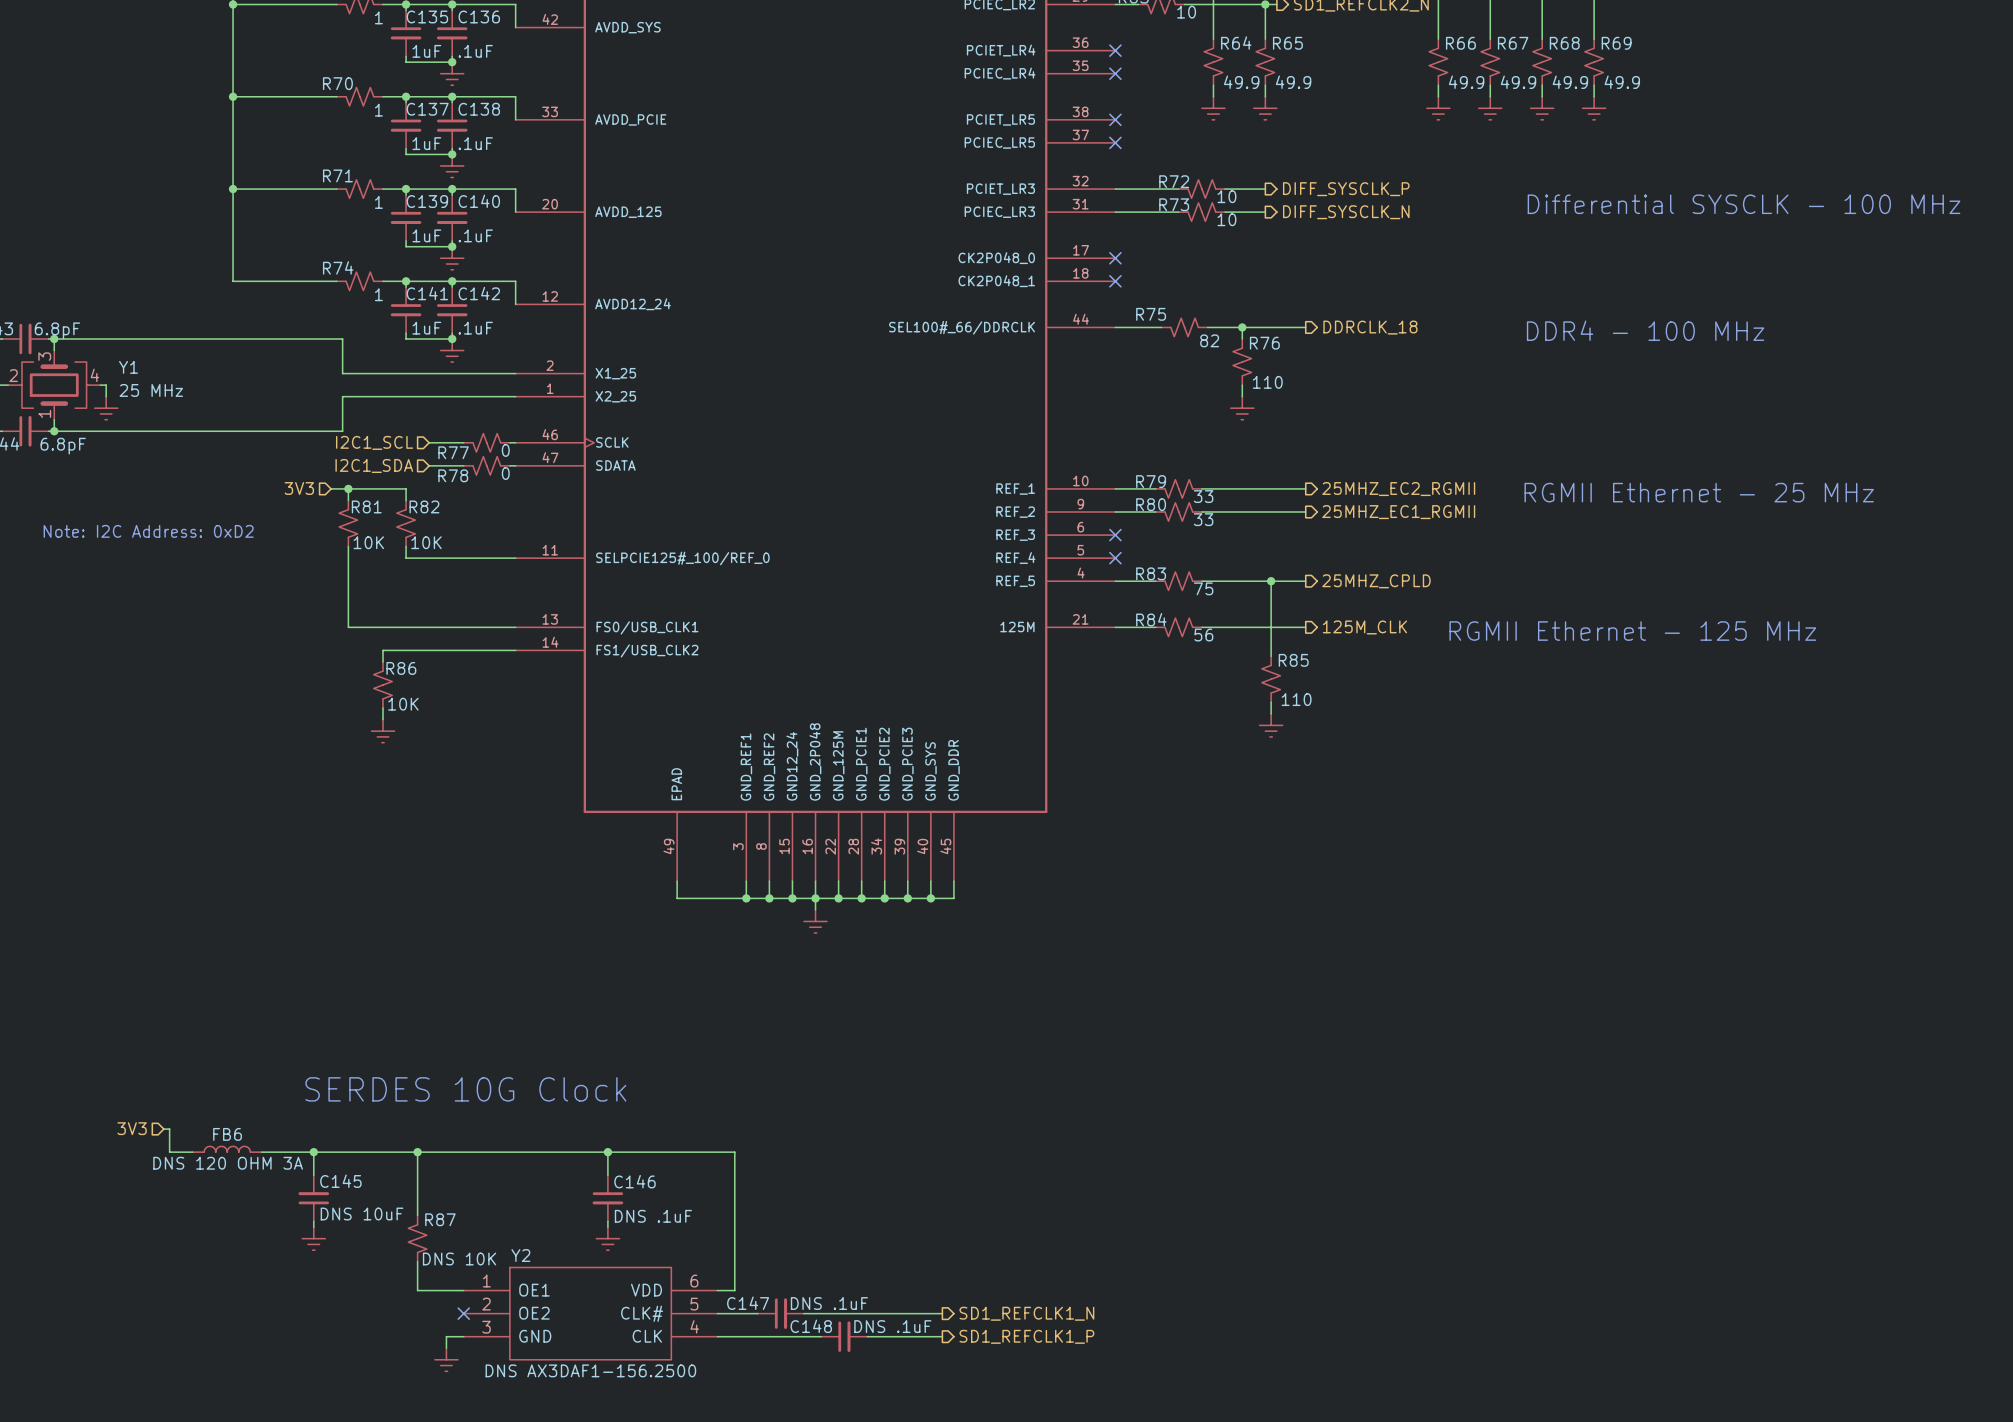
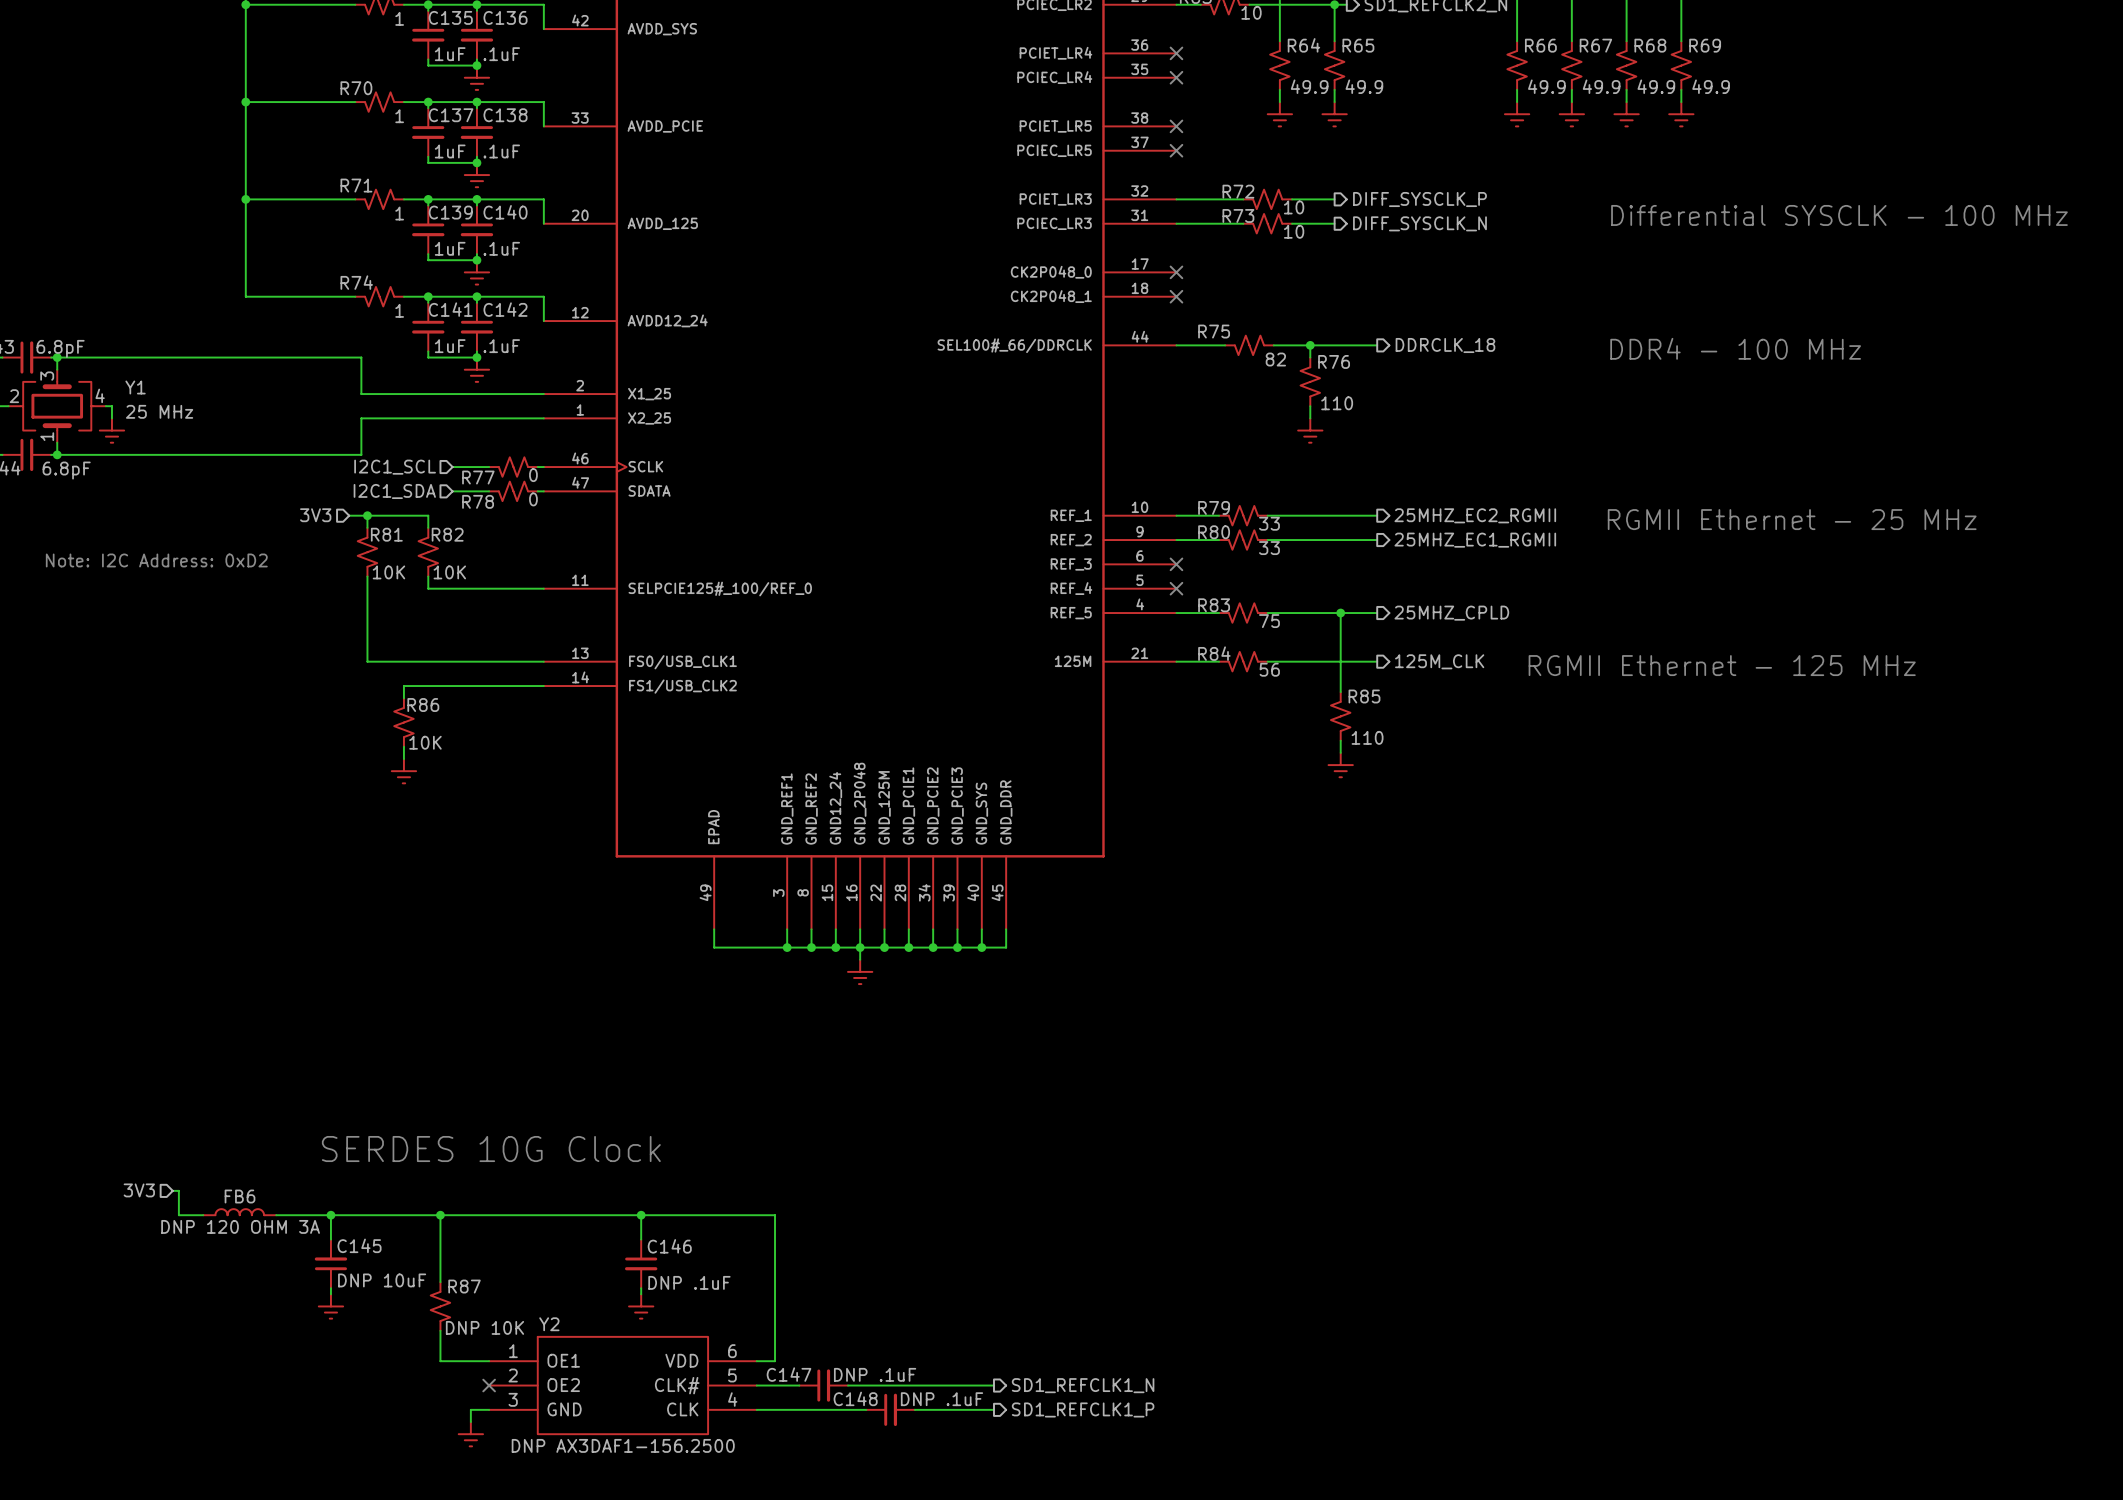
FB6 value: DNS 120 OHM 3A (228, 1163) -> DNP 120 OHM 3A (240, 1226)
C145 value: DNS 10uF (362, 1214) -> DNP 10uF (382, 1280)
C146 value: DNS .1uF (653, 1216) -> DNP .1uF (689, 1282)
R87 value: DNS 10K (459, 1258) -> DNP 10K (484, 1327)
C147 value: DNS .1uF (829, 1303) -> DNP .1uF (875, 1374)
C148 value: DNS .1uF (892, 1326) -> DNP .1uF (941, 1399)
Y2 value: DNS AX3DAF1-156.2500 (590, 1370) -> DNP AX3DAF1-156.2500 (623, 1445)

